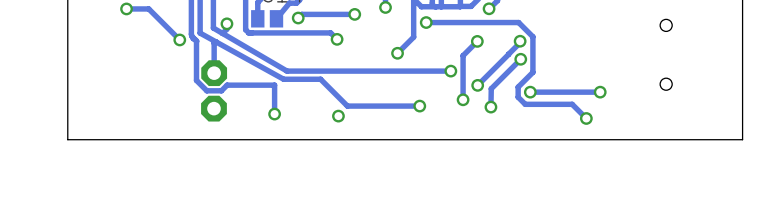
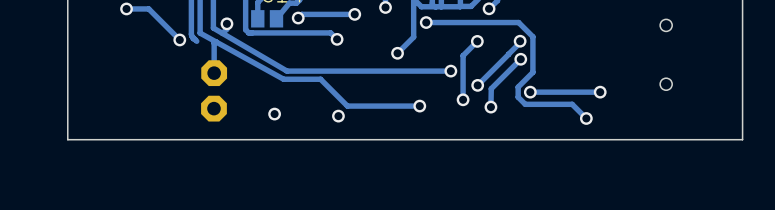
track: (196, 41) (196, 80) (206, 90) (221, 90) (227, 85) (274, 85) (274, 114) -> none

